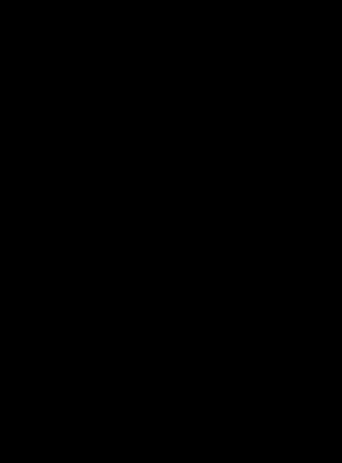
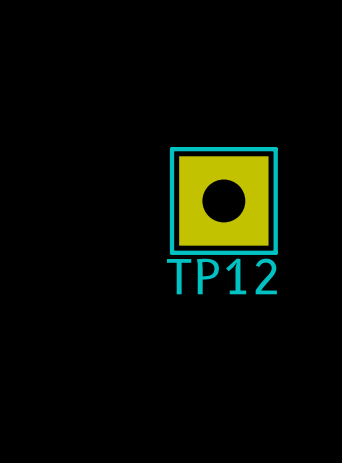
TP12: none -> (223, 200)

